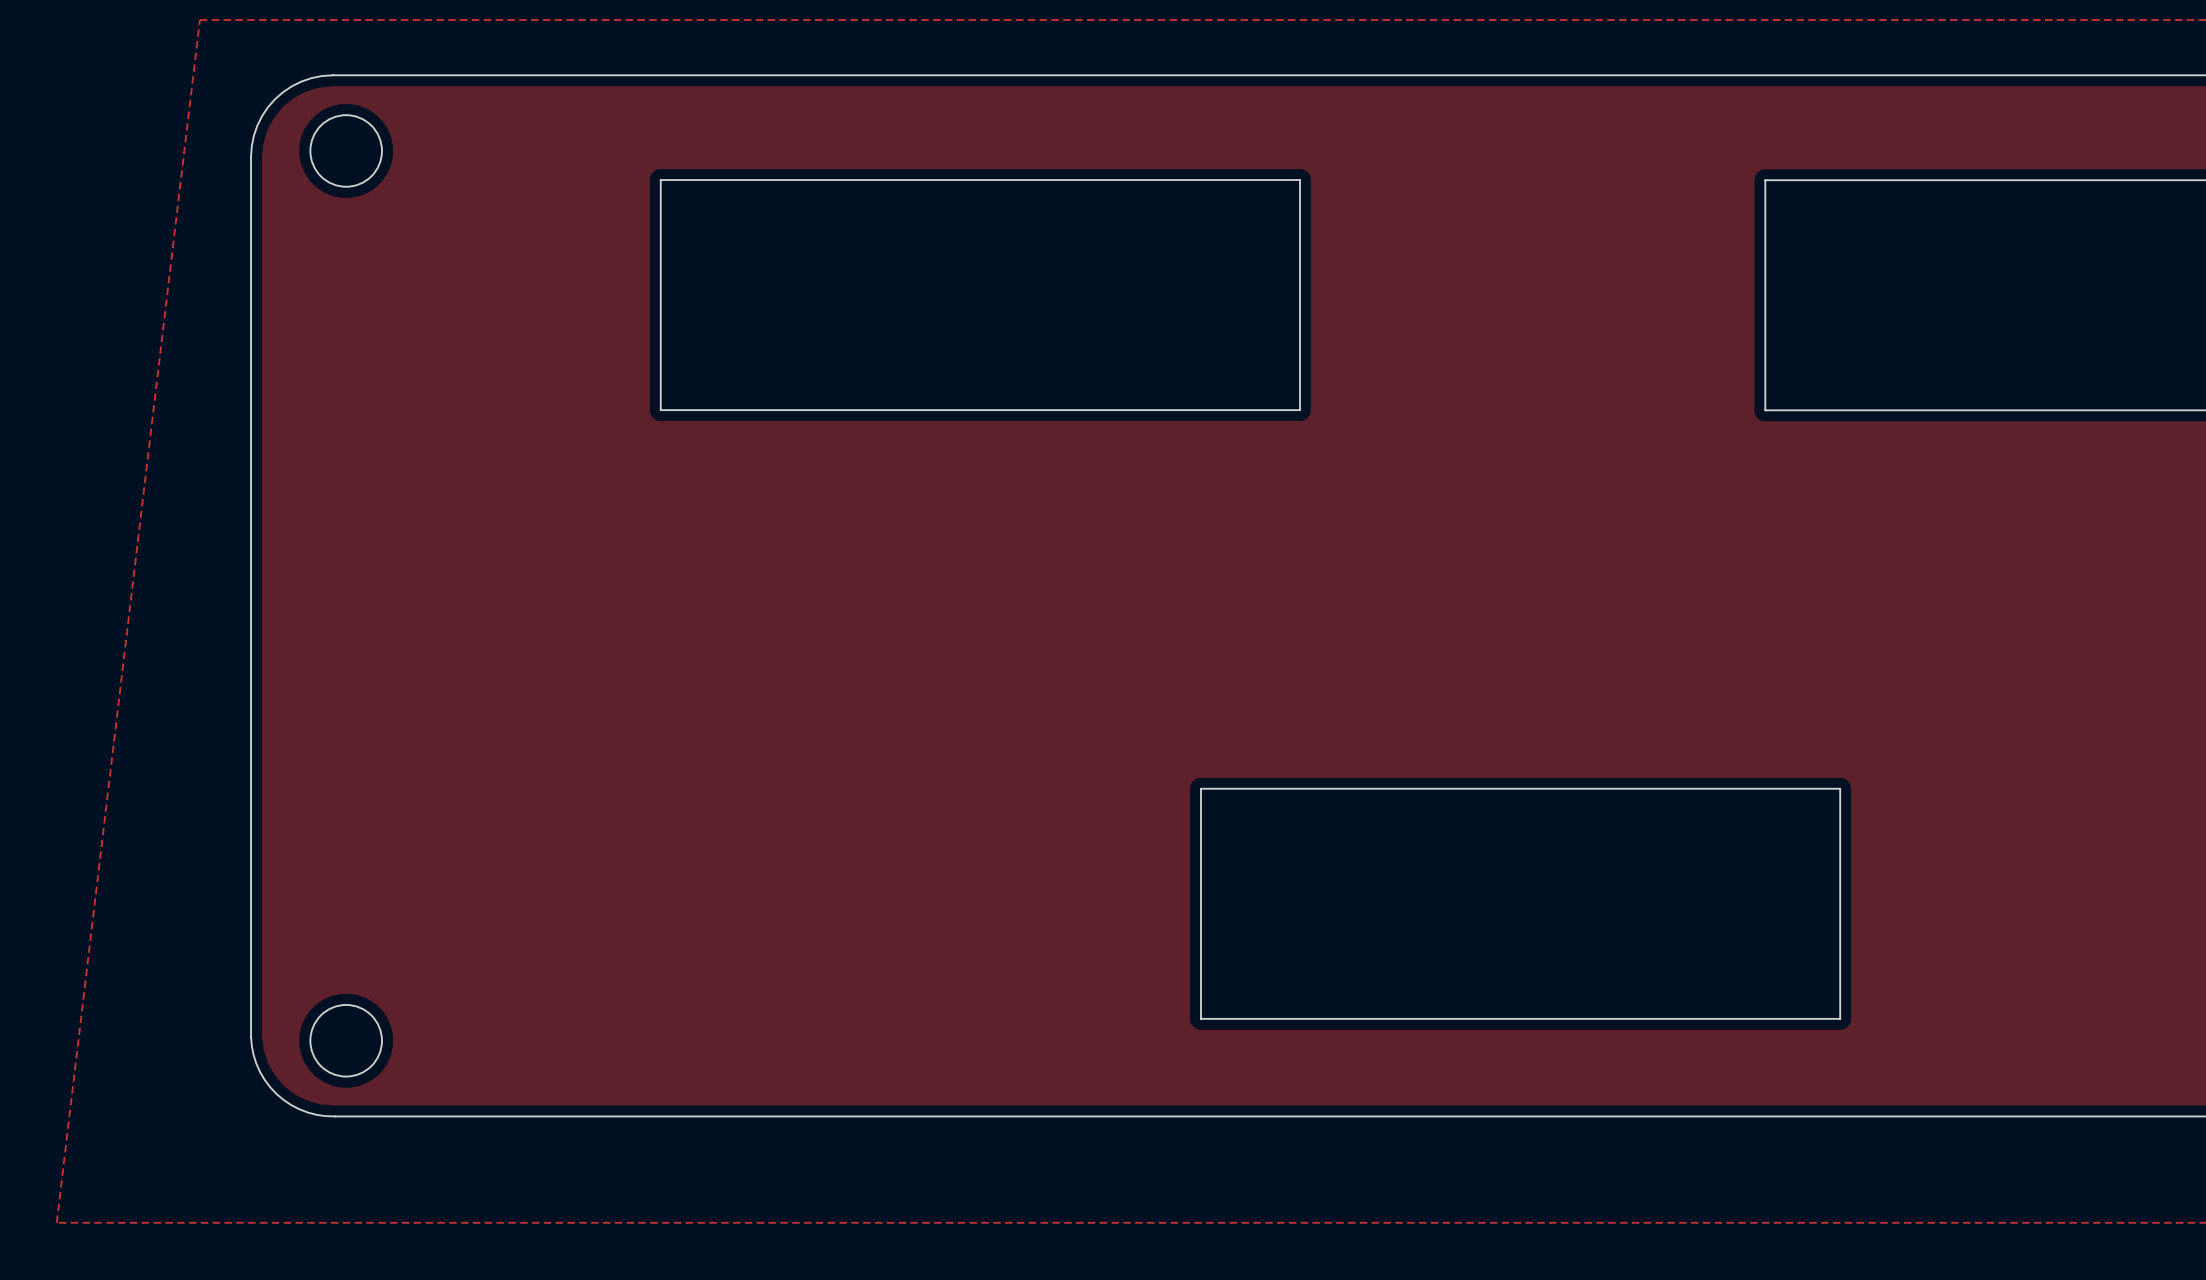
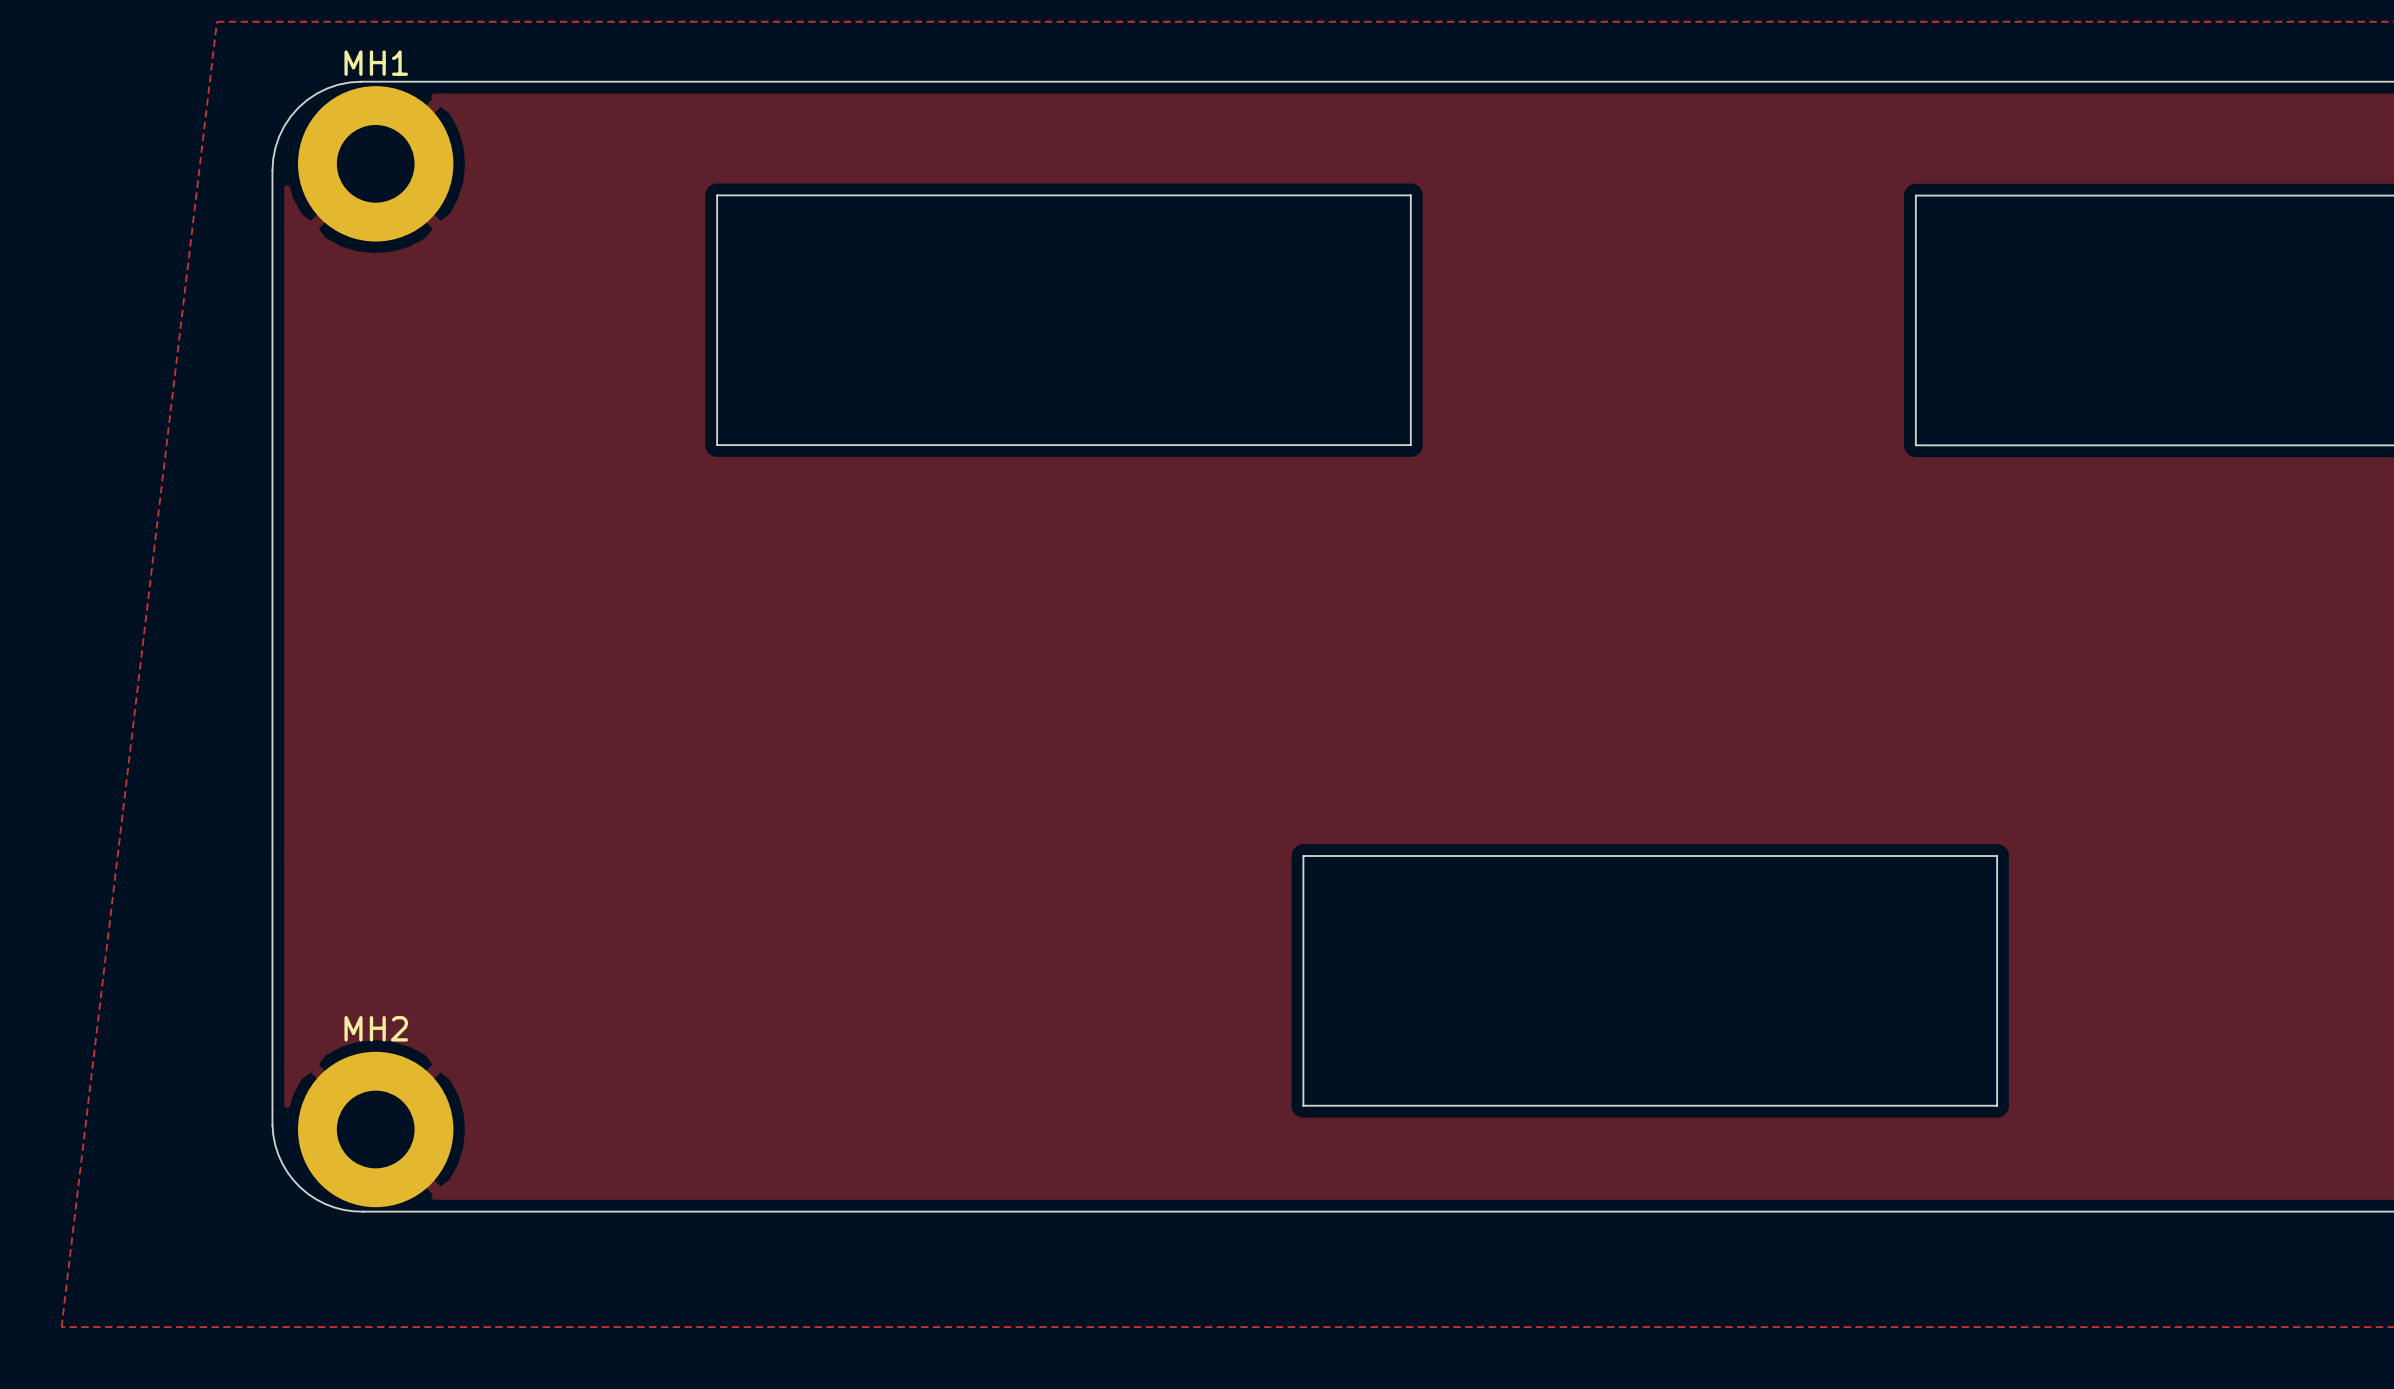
round board edge: [309, 114, 383, 188] -> none
MH1: none -> (375, 163)
round board edge: [309, 1004, 383, 1078] -> none
MH2: none -> (375, 1129)

